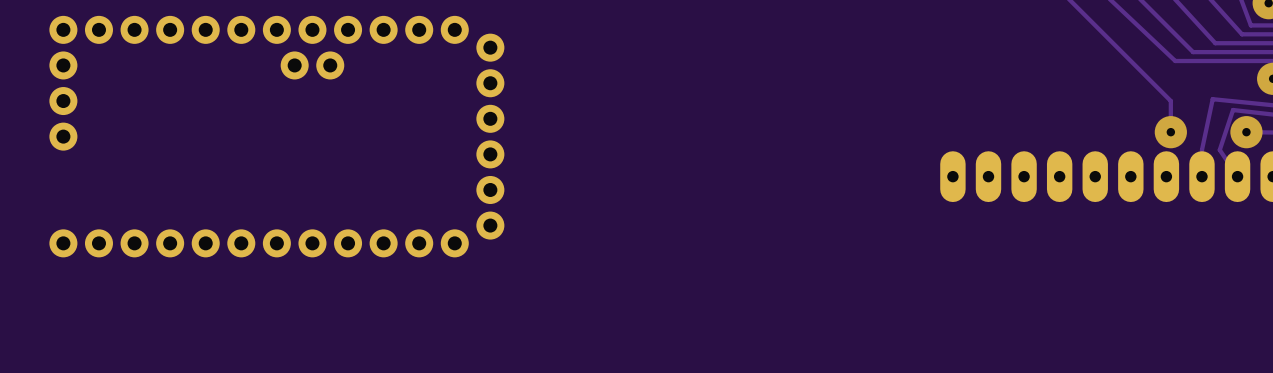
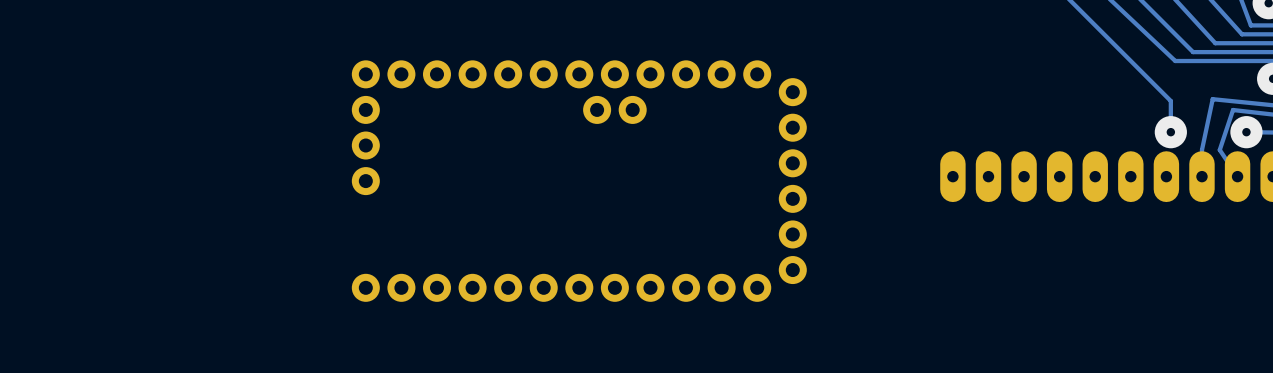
part position: (276, 136) -> (579, 181)

